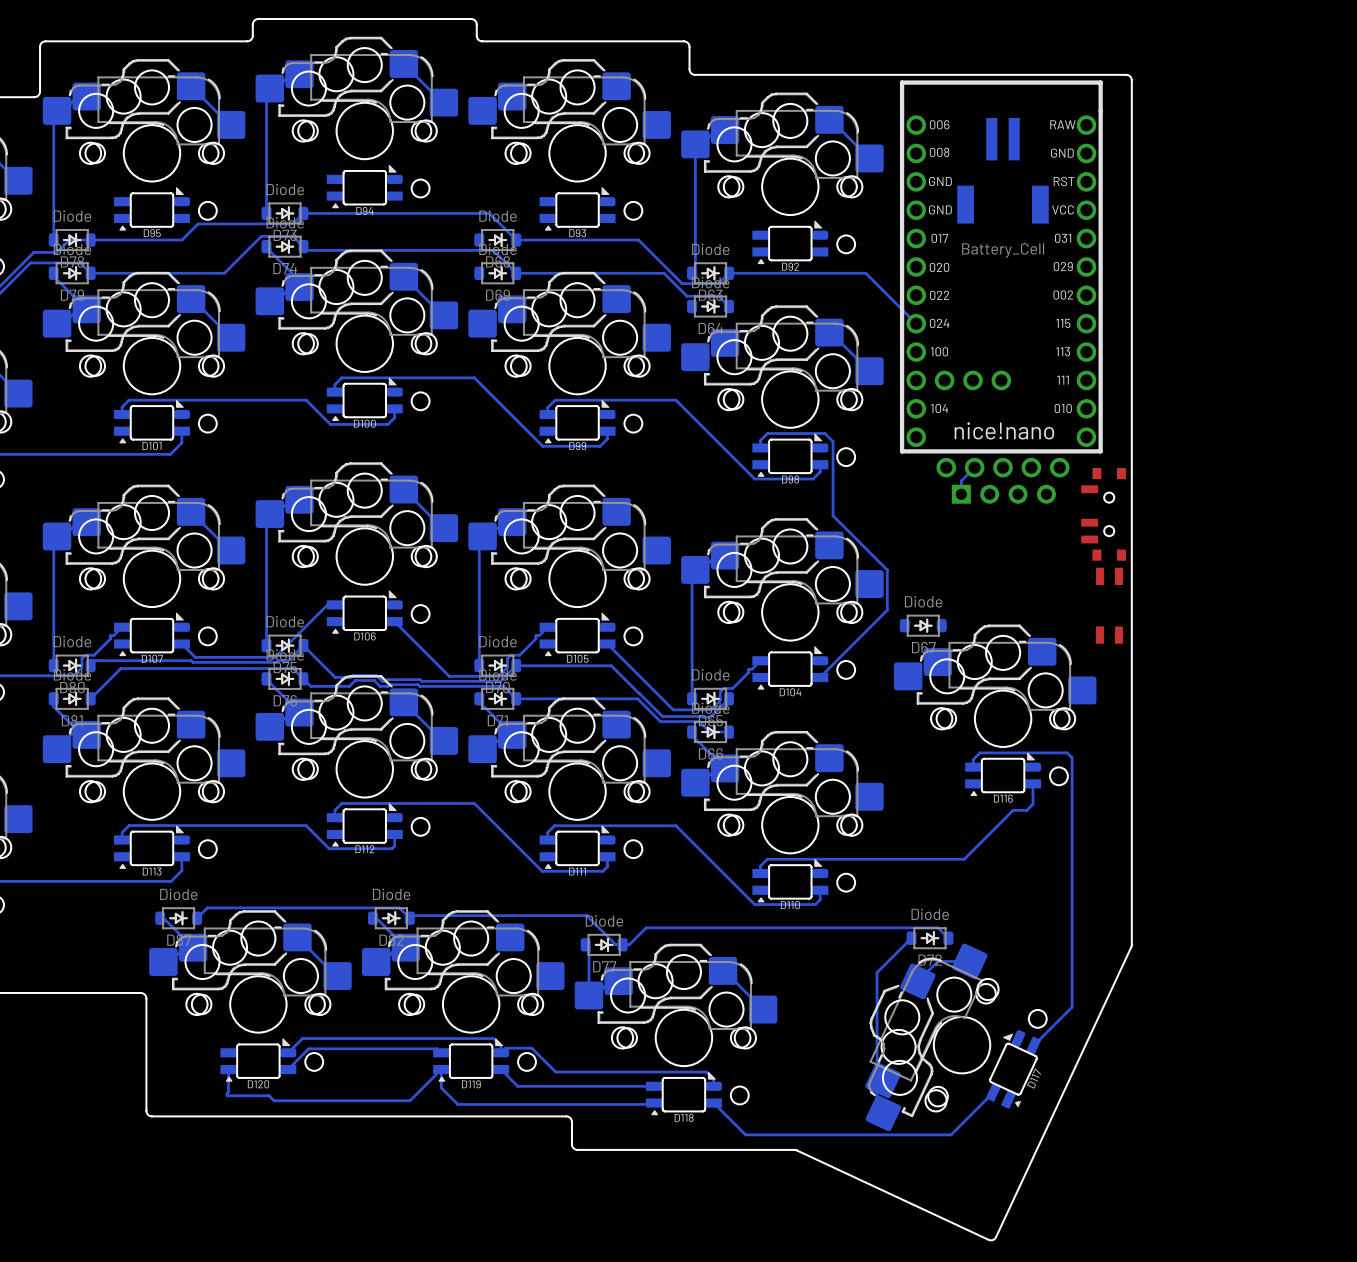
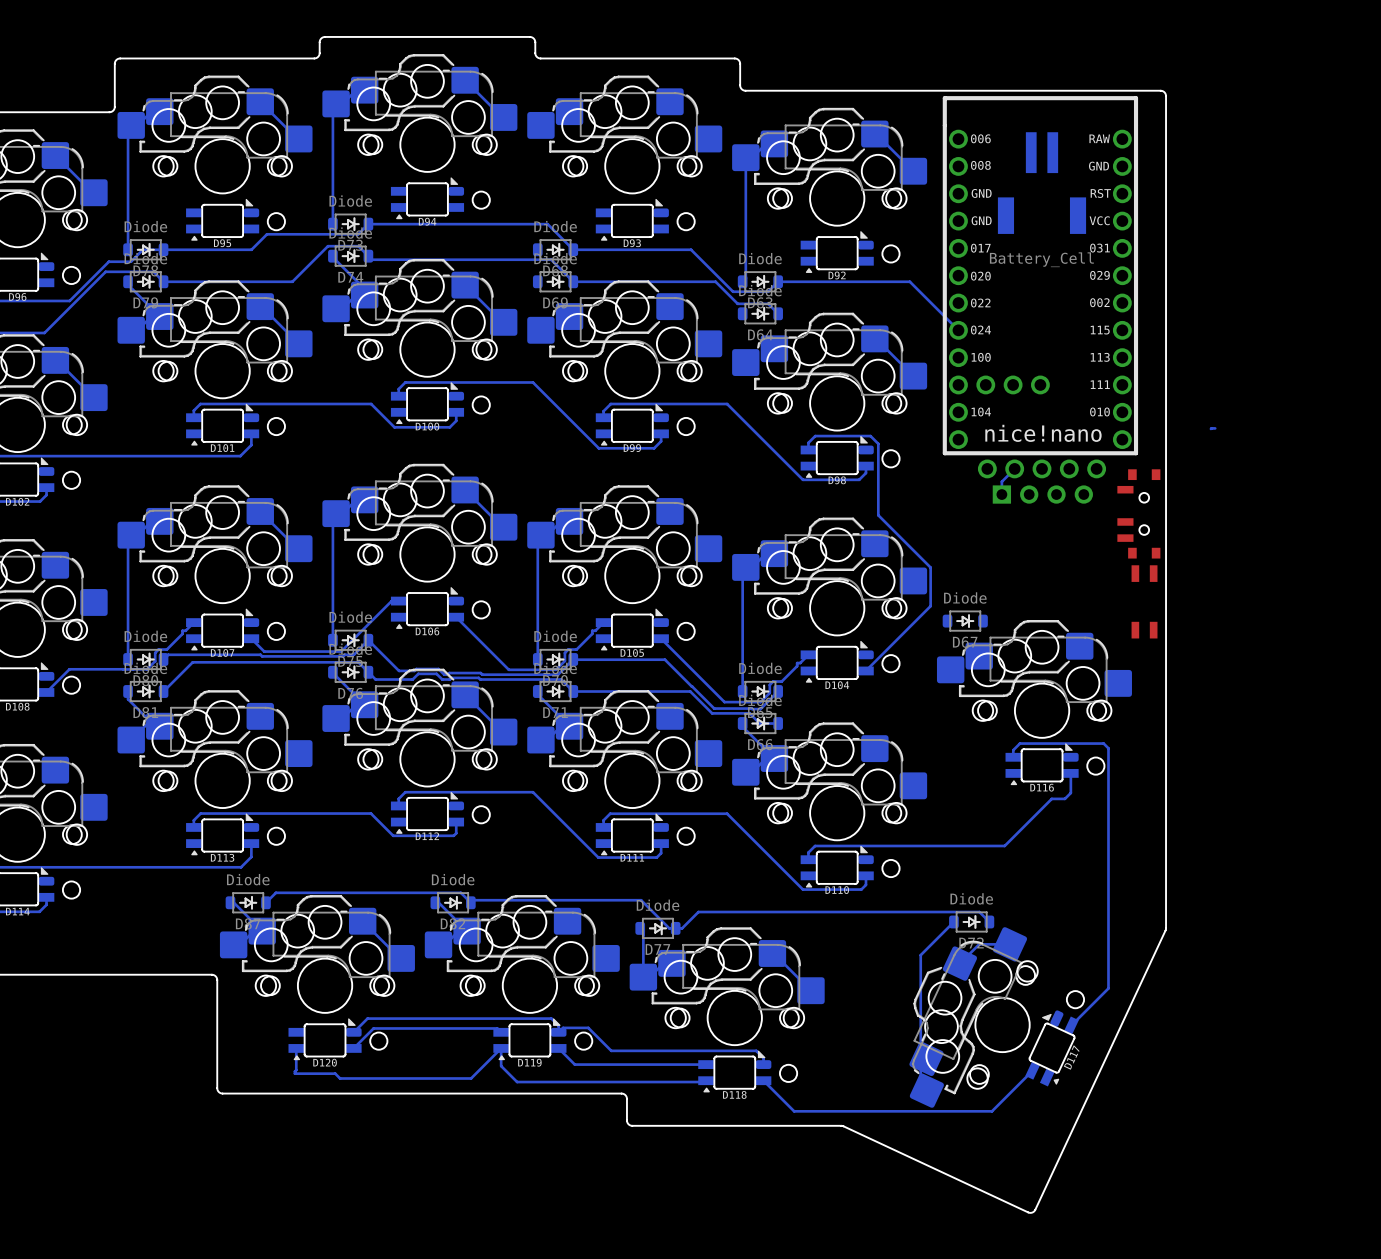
bottom track: none -> (1215, 428) (1210, 428)

